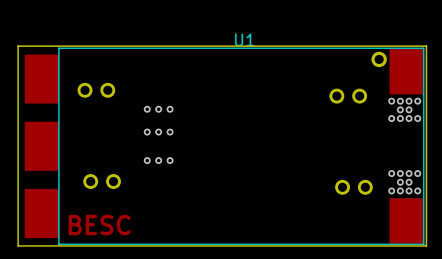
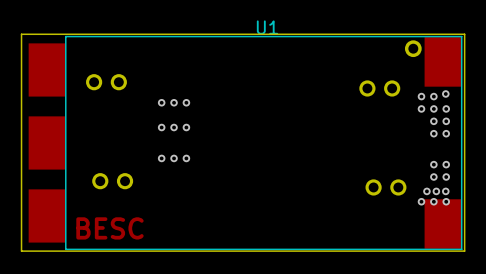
via: (391, 101) -> none
via: (400, 101) -> none
via: (417, 101) -> none
via: none -> (421, 96)
via: none -> (433, 96)
via: (400, 109) -> none
via: (409, 109) -> none
via: none -> (421, 108)
via: none -> (433, 108)
via: none -> (446, 108)
via: (391, 118) -> none
via: (400, 118) -> none
via: (409, 118) -> none
via: (417, 118) -> none
via: none -> (433, 121)
via: none -> (446, 121)
via: none -> (433, 133)
via: none -> (446, 133)
via: none -> (433, 164)
via: none -> (446, 164)
via: (391, 173) -> none
via: (400, 173) -> none
via: (409, 173) -> none
via: (417, 173) -> none
via: none -> (433, 177)
via: none -> (446, 177)
via: (400, 182) -> none
via: (409, 182) -> none
via: (417, 190) -> none
via: none -> (421, 201)
via: none -> (433, 201)
via: none -> (446, 201)

